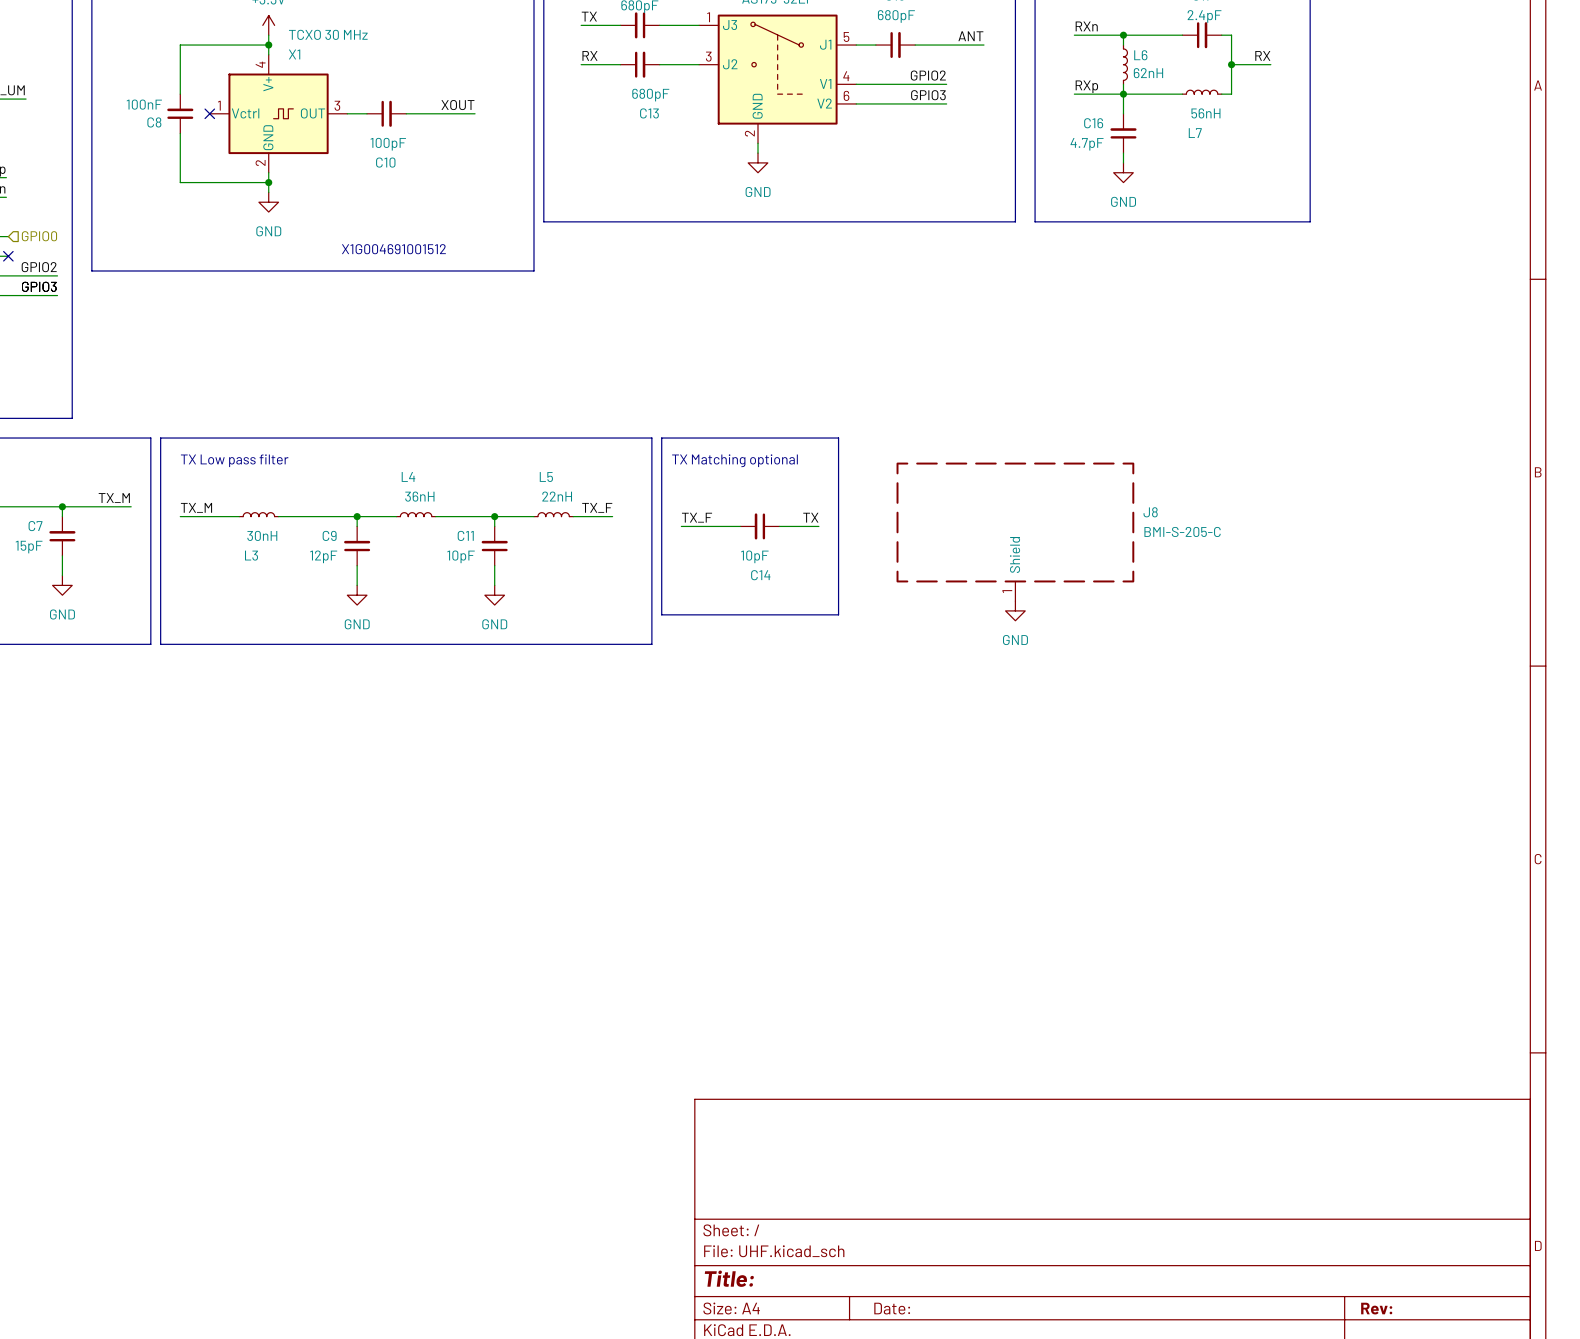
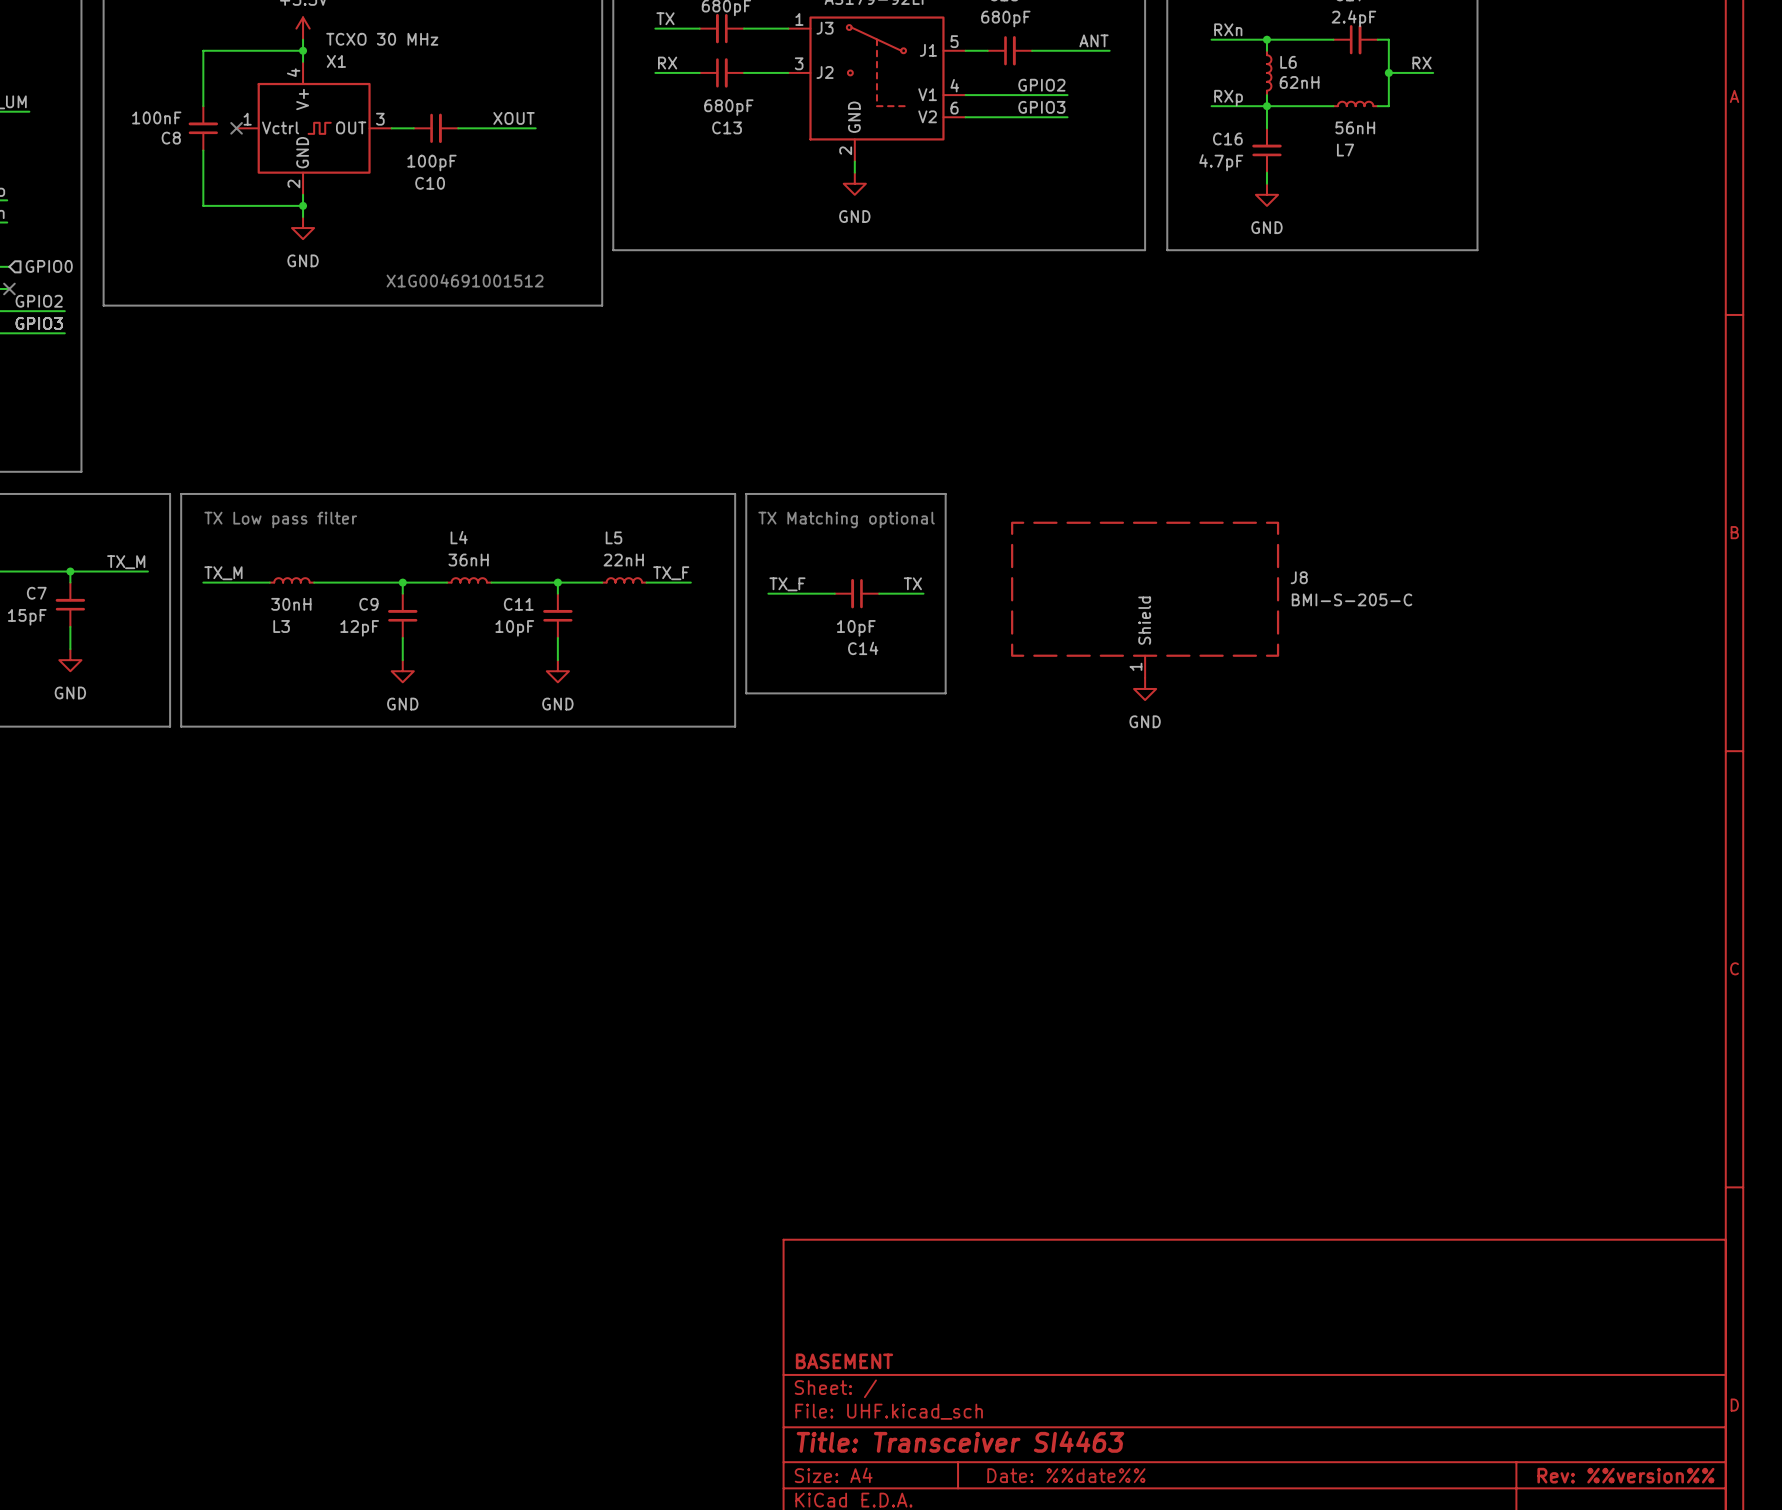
title block: none -> BASEMENT (844, 1361)
title block: Title: (729, 1278) -> Title: Transceiver SI4463 (960, 1441)
title block: Date: (892, 1308) -> Date: %%date%% (1066, 1475)
title block: Rev: (1376, 1308) -> Rev: %%version%% (1625, 1475)

